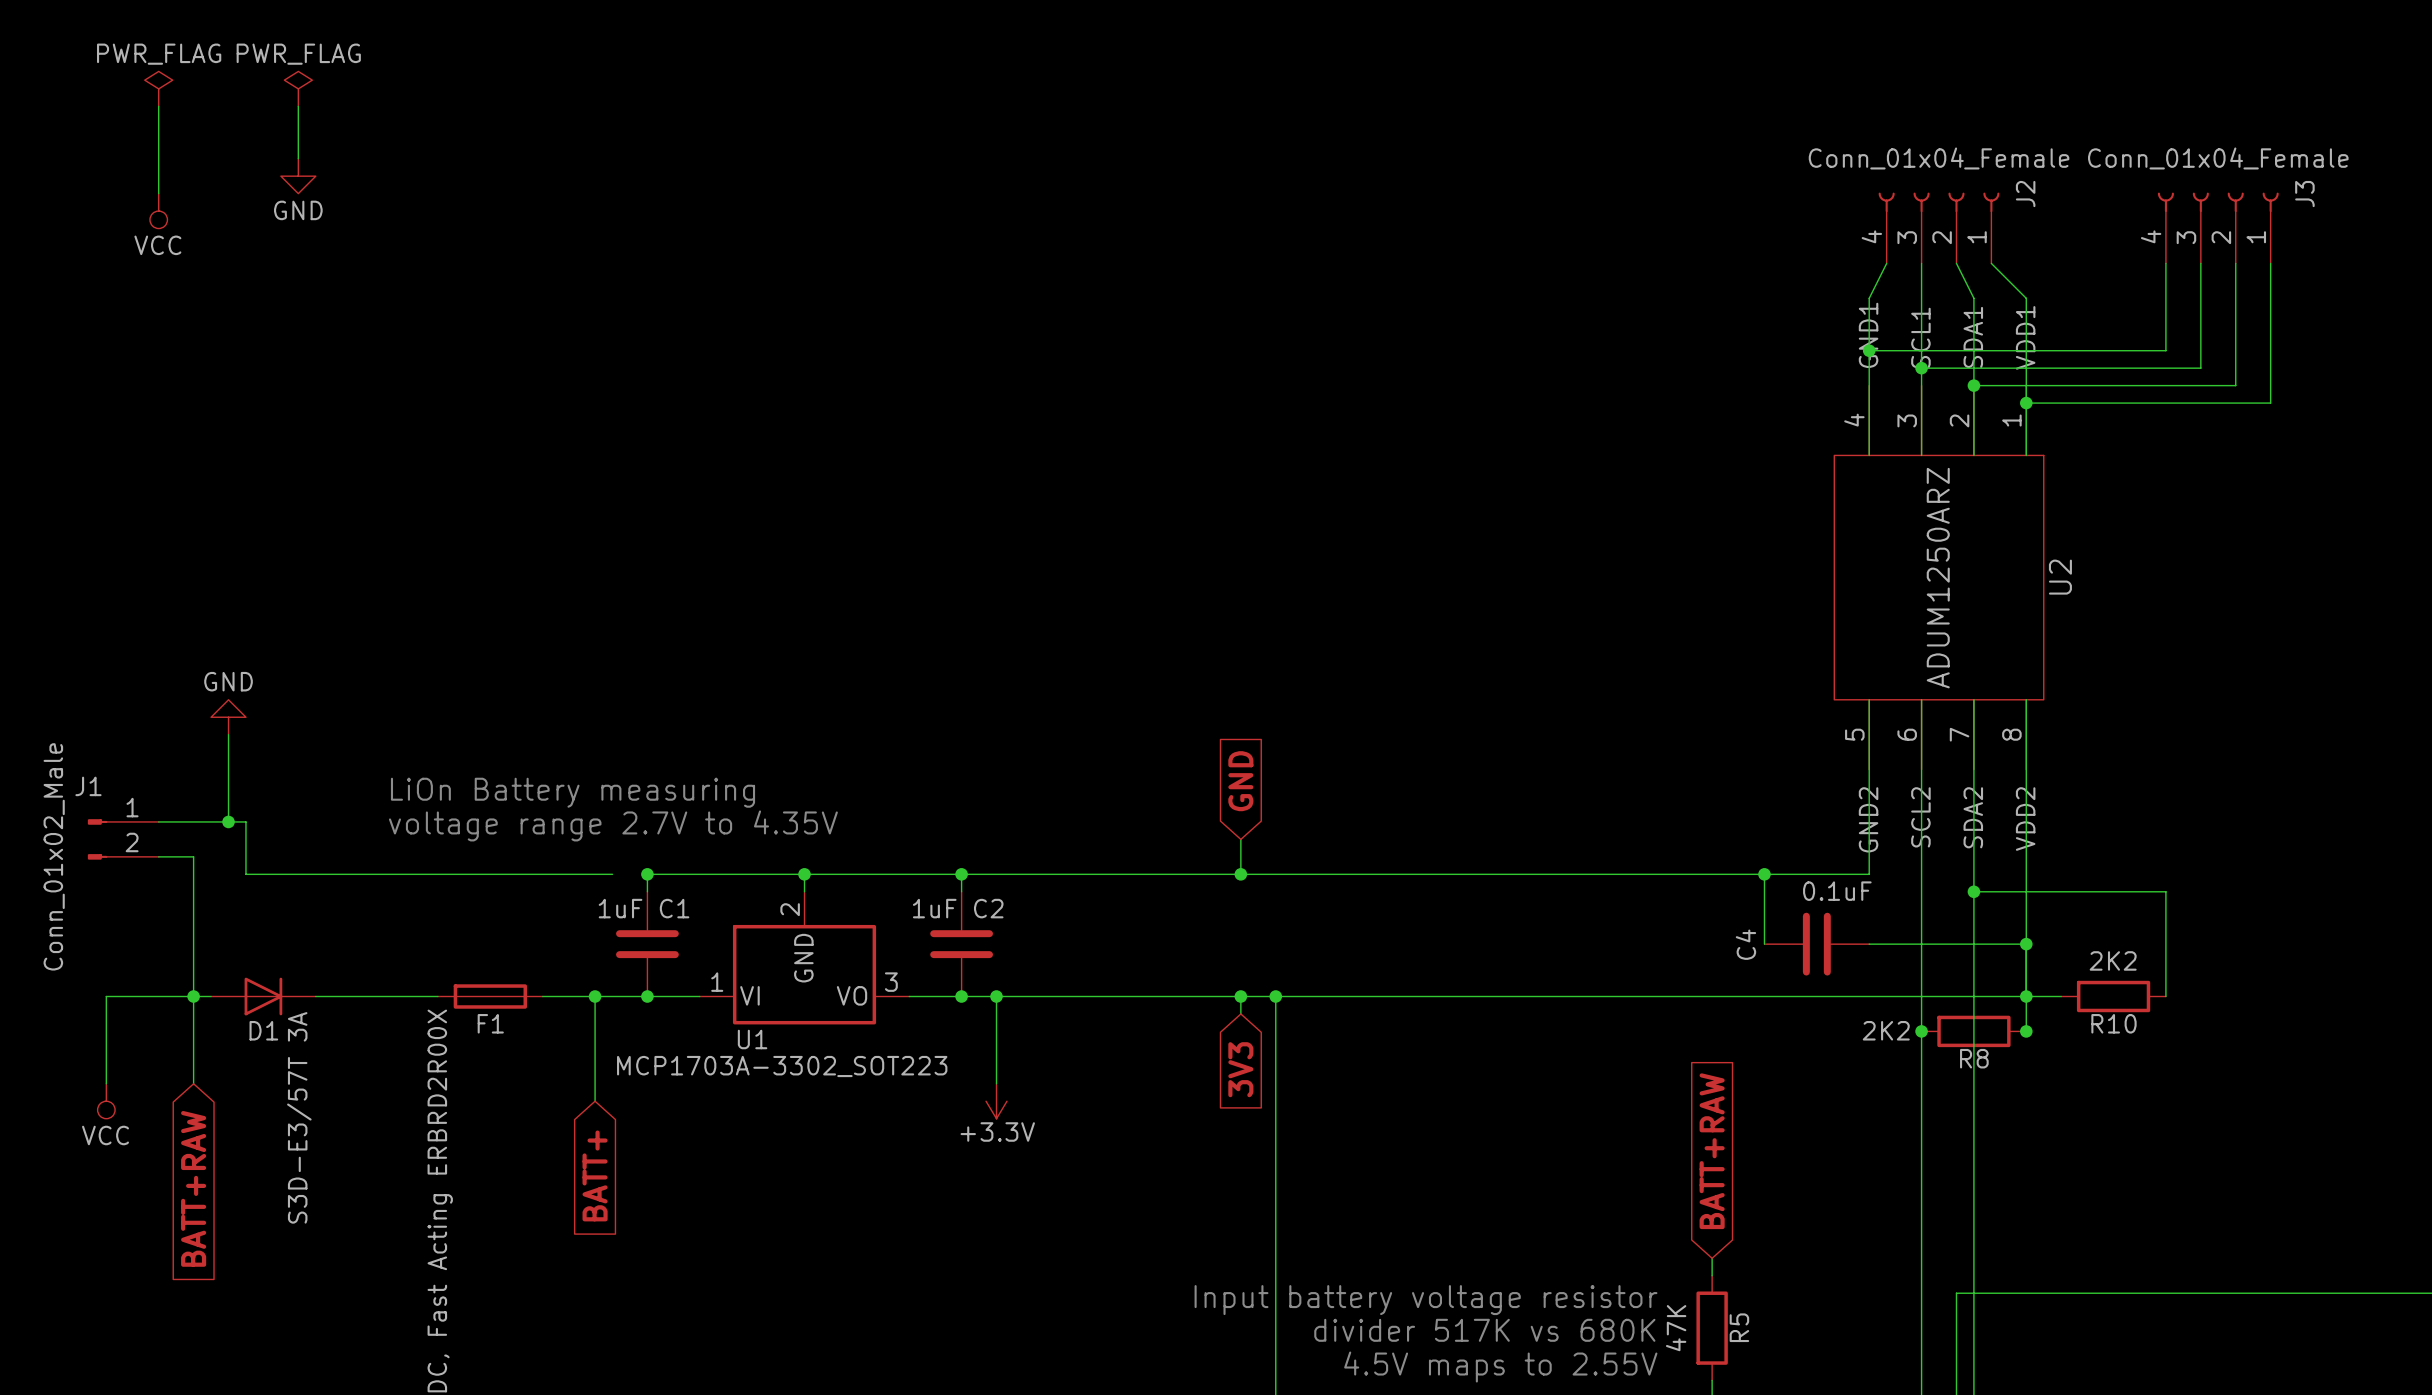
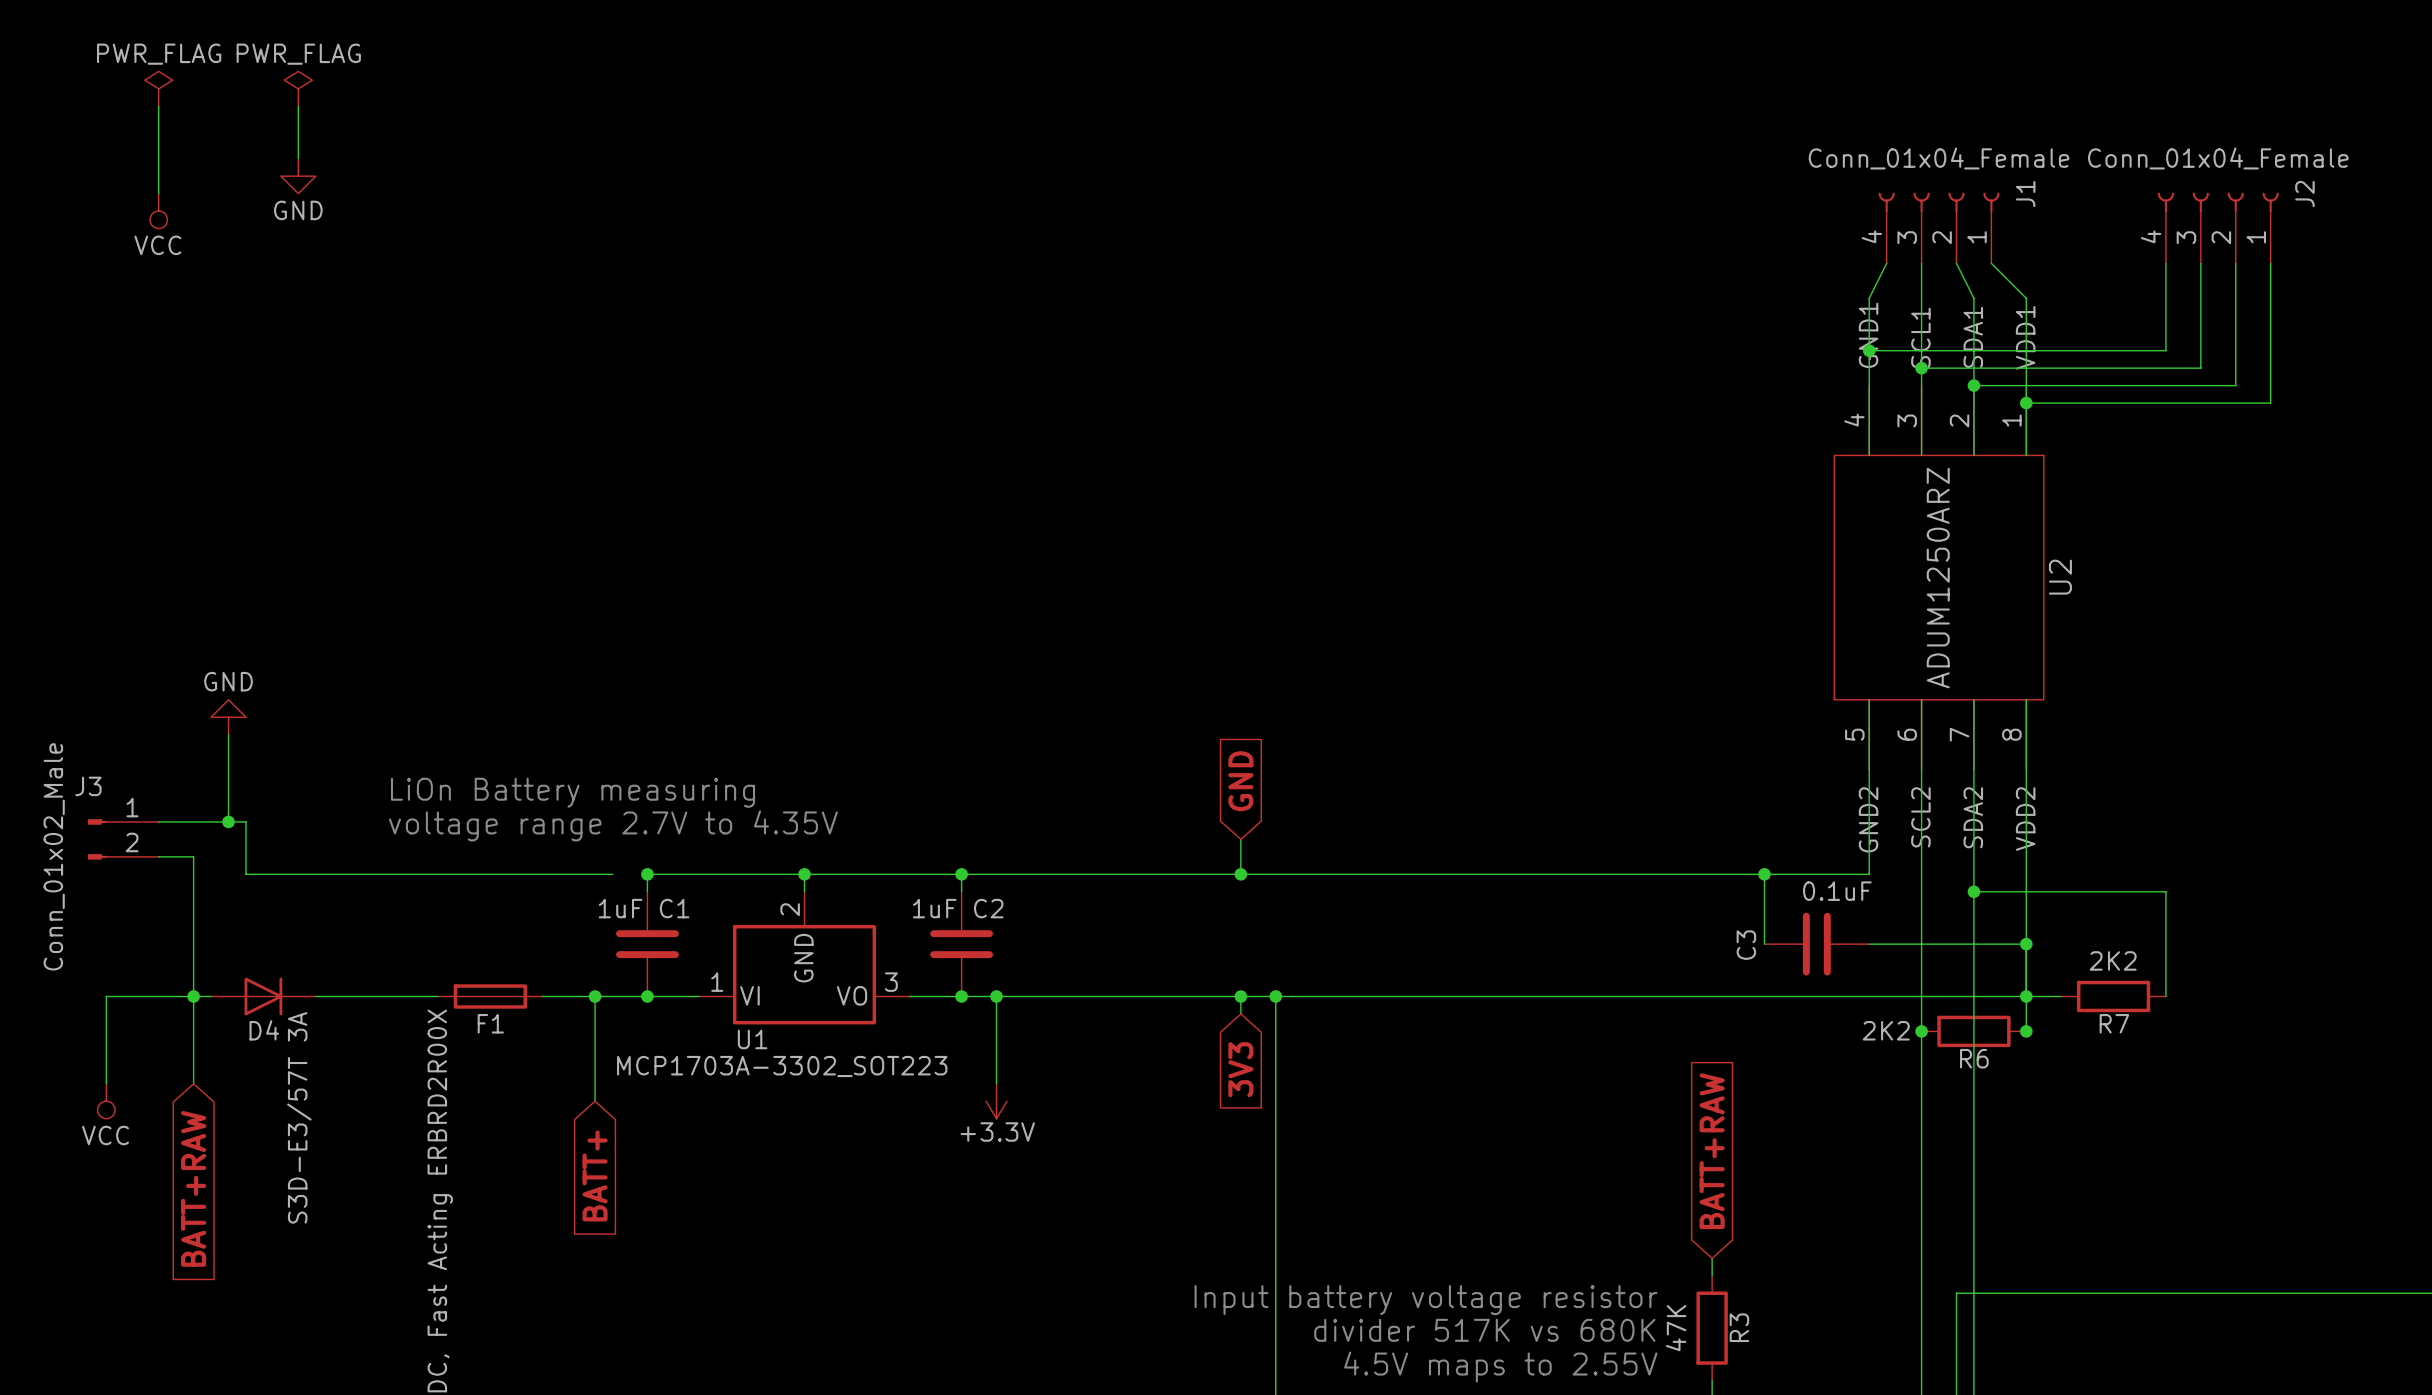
J2 name: J2 (2025, 194) -> J1 (2025, 194)
J3 name: J3 (2304, 194) -> J2 (2304, 194)
J1 name: J1 (88, 786) -> J3 (88, 786)
C4 name: C4 (1745, 944) -> C3 (1746, 945)
R10 name: R10 (2113, 1023) -> R7 (2114, 1023)
D1 name: D1 (263, 1030) -> D4 (264, 1030)
R8 name: R8 (1974, 1058) -> R6 (1974, 1058)
R5 name: R5 (1739, 1327) -> R3 (1739, 1327)

